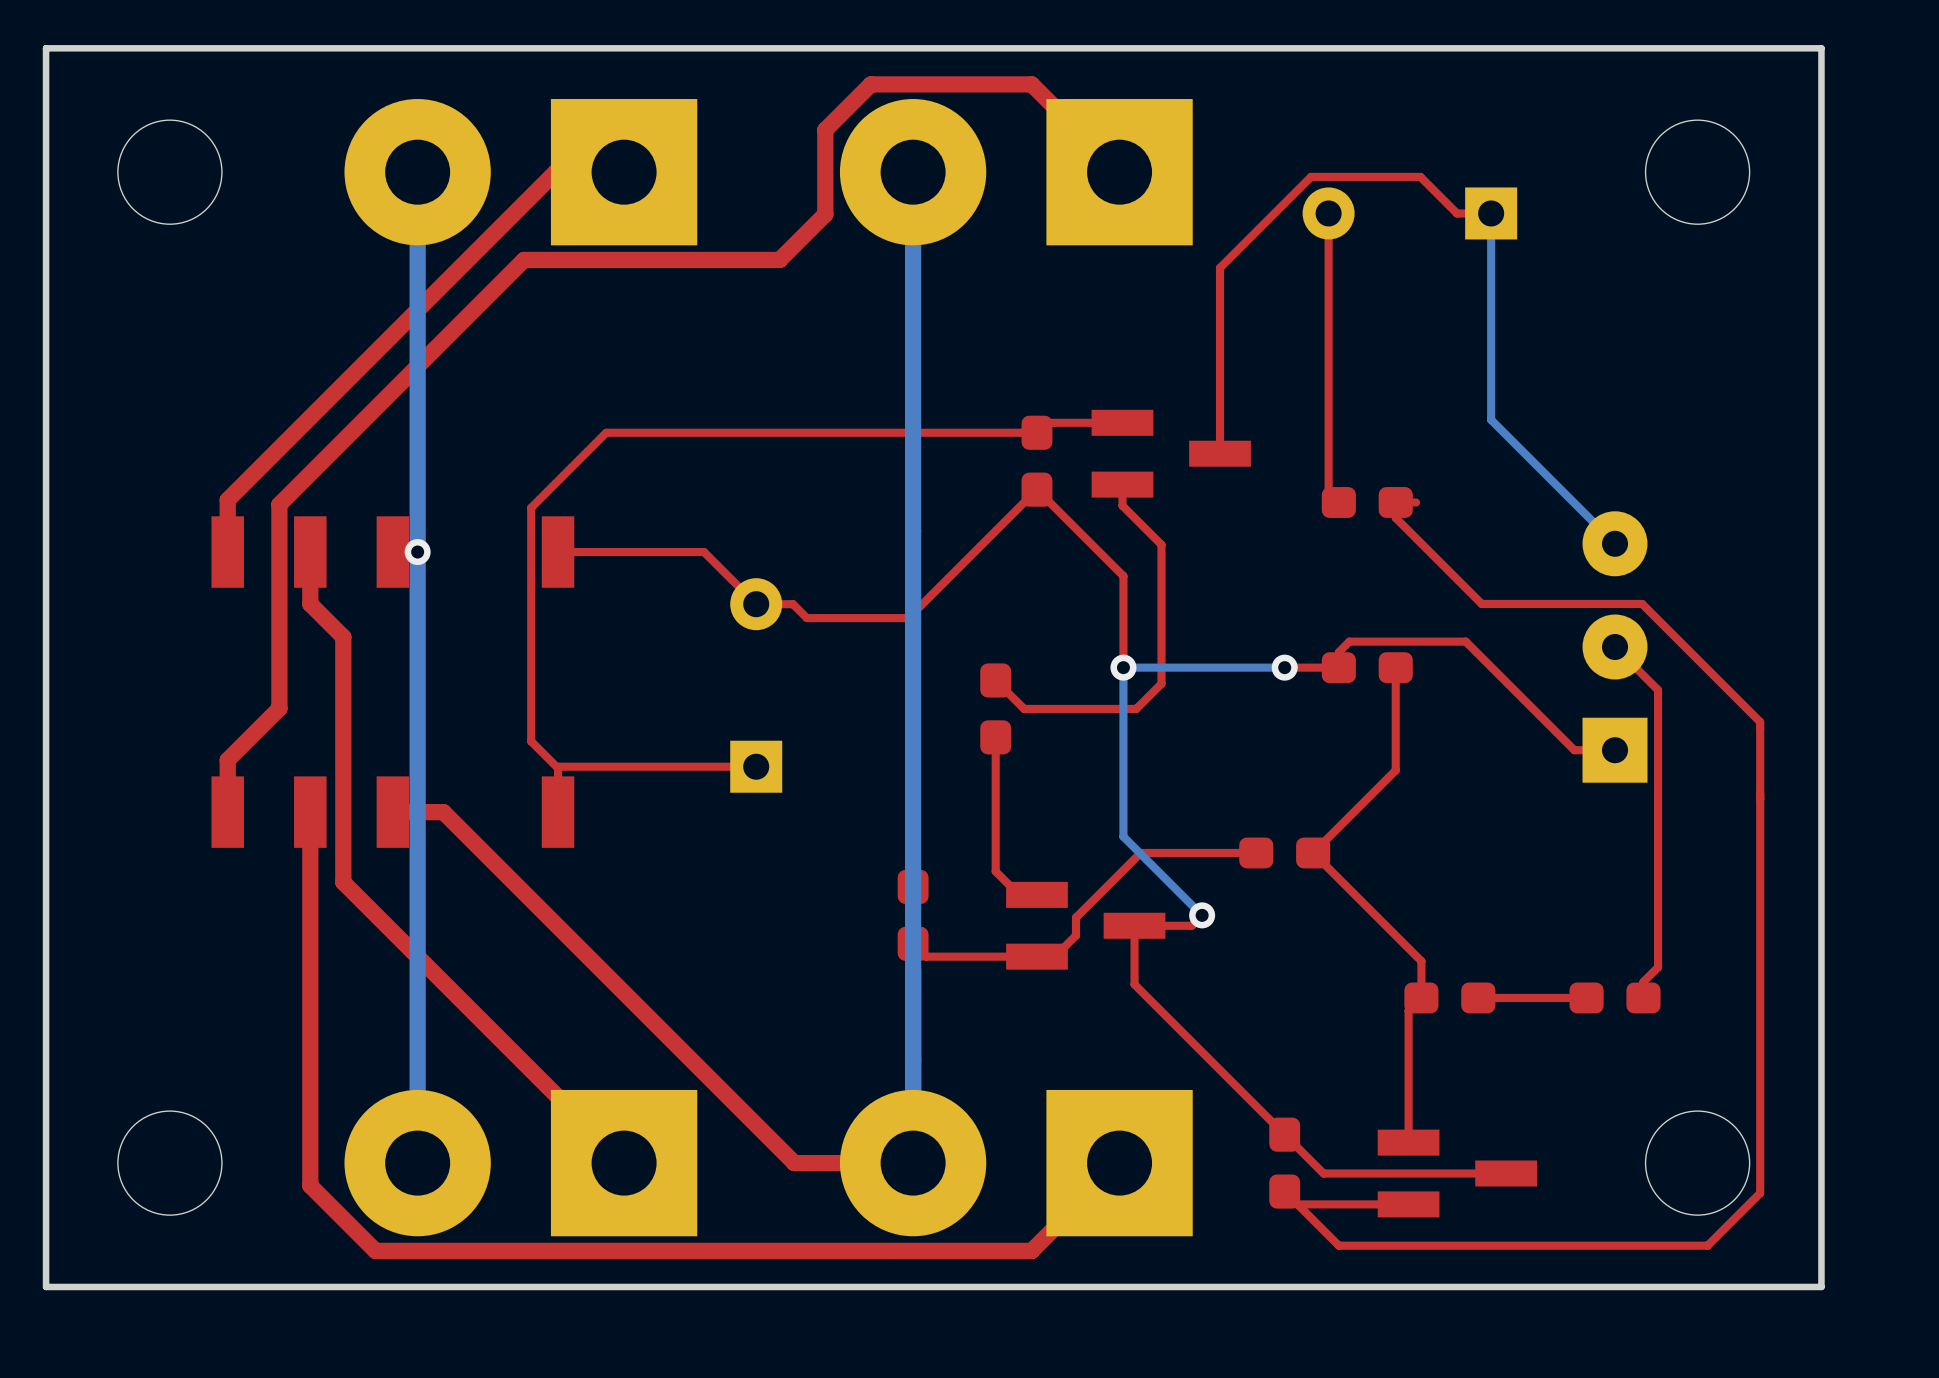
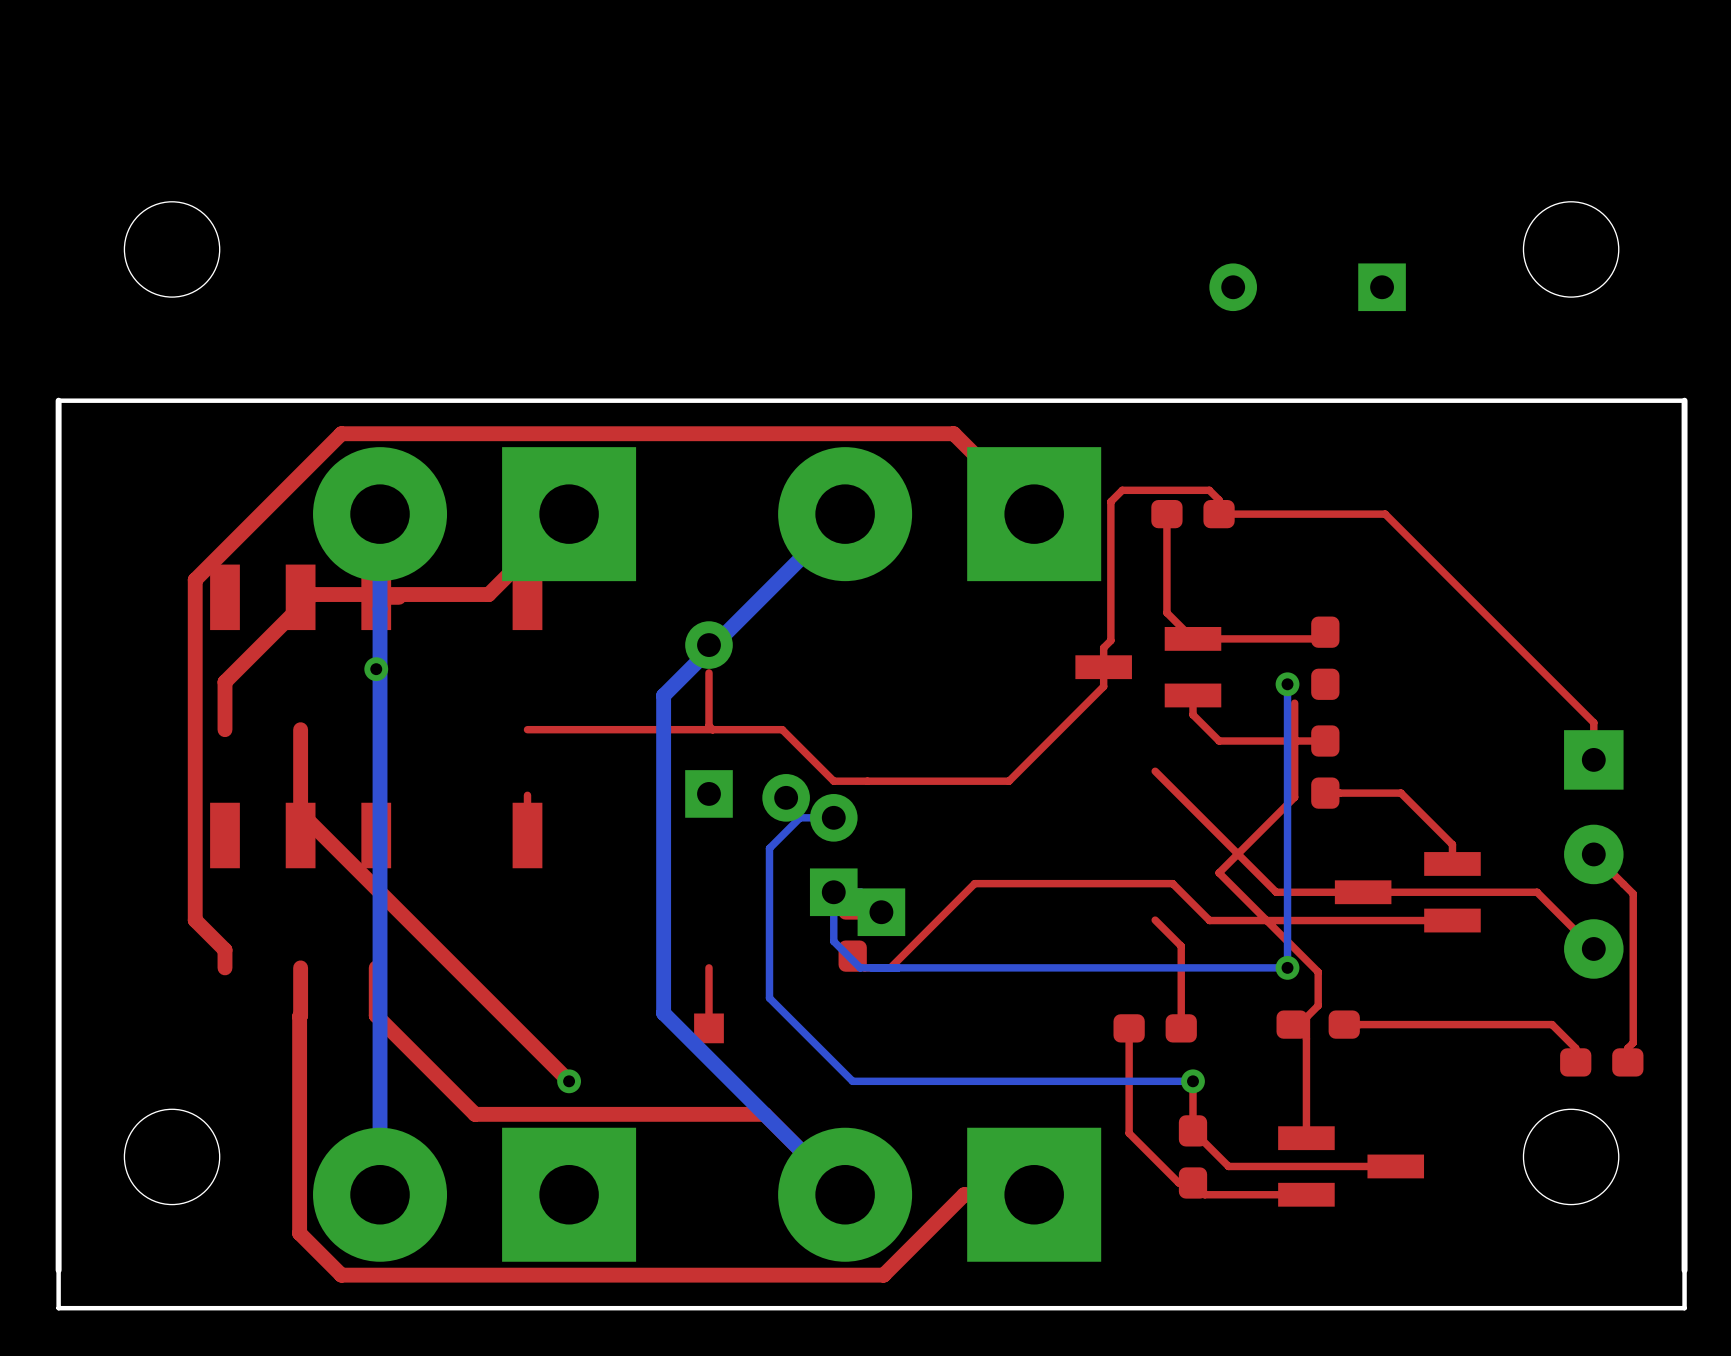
bottom track: (417, 172) (417, 1163) -> none
part position: (520, 172) -> (474, 514)
top track: (624, 172) (555, 172) (227, 500) (227, 552) -> none
bottom track: (913, 172) (913, 1163) -> none
part: (1016, 172) -> none
top track: (1119, 172) (1031, 84) (870, 84) (825, 130) (825, 214) (779, 259) (524, 259) (279, 504) (279, 708) (227, 760) (227, 812) -> none
top track: (1328, 213) (1328, 492) (1338, 502) -> none
top track: (1491, 213) (1457, 213) (1420, 176) (1311, 176) (1220, 267) (1220, 453) -> none
bottom track: (1491, 213) (1491, 419) (1615, 543) -> none
board edge: (1821, 337) (1821, 48) (46, 48) (46, 337) -> (1684, 400) (58, 400)
part footprint: [1021, 415, 1053, 507] -> [778, 447, 1102, 582]
top track: (1122, 422) (1046, 422) (1036, 432) -> none
top track: (1036, 432) (606, 432) (531, 507) (531, 741) (558, 768) (756, 766) -> none
part: (1171, 453) -> none
bottom track: none -> (380, 514) (380, 1194)
top track: none -> (569, 514) (488, 594) (312, 594) (224, 682) (224, 729)
bottom track: none -> (845, 514) (663, 695) (663, 1013) (845, 1194)
top track: none -> (1034, 514) (953, 433) (341, 433) (195, 579) (195, 920) (224, 950) (224, 967)
top track: none -> (1166, 514) (1166, 612) (1192, 638) (1318, 638) (1325, 632)
part: none -> (1192, 514)
top track: (1122, 484) (1122, 505) (1161, 544) (1161, 683) (1136, 708) (1024, 708) (995, 680) -> none
part: (1367, 502) -> none
top track: (1416, 502) (1395, 502) (1395, 517) (1481, 603) (1642, 603) (1760, 721) (1760, 1193) (1707, 1245) (1338, 1245) (1297, 1204) -> none
top track: (310, 552) (310, 604) (343, 637) (343, 882) (624, 1163) -> none
via position: (417, 552) -> (376, 669)
top track: (558, 552) (704, 552) (756, 604) (792, 604) (806, 618) (913, 618) -> none
part: none -> (1325, 658)
part: none -> (1148, 667)
top track: none -> (708, 672) (708, 725) (712, 729)
bottom track: none -> (1287, 684) (1287, 967) (860, 967) (833, 941) (833, 892) (861, 892) (881, 912)
top track: (1615, 646) (1658, 690) (1658, 967) (1643, 981) (1643, 997) -> none
part rotation: 0° (1615, 646) -> 180° (1593, 854)
part position: (1615, 646) -> (1593, 854)
top track: none -> (1192, 695) (1192, 714) (1219, 741) (1325, 741)
top track: (1123, 667) (1123, 576) (1036, 489) (913, 613) (913, 886) -> none
via: (1123, 667) -> none
top track: (1284, 667) (1338, 667) (1338, 652) (1349, 641) (1465, 641) (1574, 750) (1615, 750) -> none
bottom track: (1284, 667) (1123, 667) (1123, 836) (1202, 915) -> none
via position: (1284, 667) -> (1287, 684)
part: (1367, 667) -> none
top track: none -> (300, 729) (300, 812) (569, 1081)
top track: none -> (527, 729) (782, 729) (833, 781) (1009, 781) (1103, 686) (1103, 647) (1110, 640) (1110, 501) (1122, 490) (1209, 490) (1219, 499) (1219, 514) (1385, 514) (1593, 722) (1593, 759)
part: (995, 708) -> none
top track: (995, 737) (995, 871) (1019, 894) (1036, 894) -> none
part: none -> (1325, 767)
top track: none -> (1155, 771) (1276, 892) (1537, 892) (1593, 948)
top track: none -> (1325, 793) (1400, 793) (1452, 844) (1452, 863)
bottom track: none -> (833, 817) (800, 817) (769, 848) (769, 998) (852, 1081) (1192, 1081)
top track: (310, 812) (310, 956) -> none
top track: (392, 812) (443, 812) (794, 1163) (913, 1163) -> none
top track: none -> (1593, 854) (1633, 893) (1633, 1042) (1627, 1048) (1627, 1062)
part: none -> (833, 855)
top track: (1256, 852) (1140, 852) (1075, 917) (1075, 935) (1054, 956) (954, 956) -> (1452, 920) (1209, 920) (1172, 883) (974, 883) (890, 967)
part: (1284, 852) -> none
part: none -> (1407, 892)
top track: none -> (1155, 920) (1181, 946) (1181, 1028)
top track: (1202, 915) (1191, 925) (1134, 925) (1134, 984) (1284, 1134) -> (1192, 1081) (1192, 1130)
via: (1202, 915) -> none
part: (1085, 925) -> none
top track: none -> (376, 967) (376, 1015) (475, 1114) (764, 1114) (845, 1194)
top track: none -> (708, 967) (708, 1028)
via: none -> (1287, 967)
part position: (1449, 997) -> (1318, 1024)
top track: (1586, 997) (1478, 997) -> none
part: (1615, 997) -> none
top track: (310, 1008) (310, 1185) (375, 1250) (1031, 1250) (1119, 1163) -> (300, 1015) (299, 1233) (341, 1275) (883, 1275) (964, 1194) (1034, 1194)
top track: none -> (1344, 1024) (1552, 1024) (1575, 1048) (1575, 1062)
part: none -> (708, 1028)
top track: none -> (1129, 1028) (1129, 1133) (1178, 1182) (1192, 1182)
part: none -> (1155, 1028)
part: none -> (1601, 1062)
via: none -> (569, 1081)
via: none -> (1192, 1081)
part position: (520, 1163) -> (474, 1194)
part position: (1016, 1163) -> (939, 1194)
board edge: (1821, 1286) (46, 1286) -> (1684, 1270) (1684, 1308) (58, 1308) (58, 1270)

